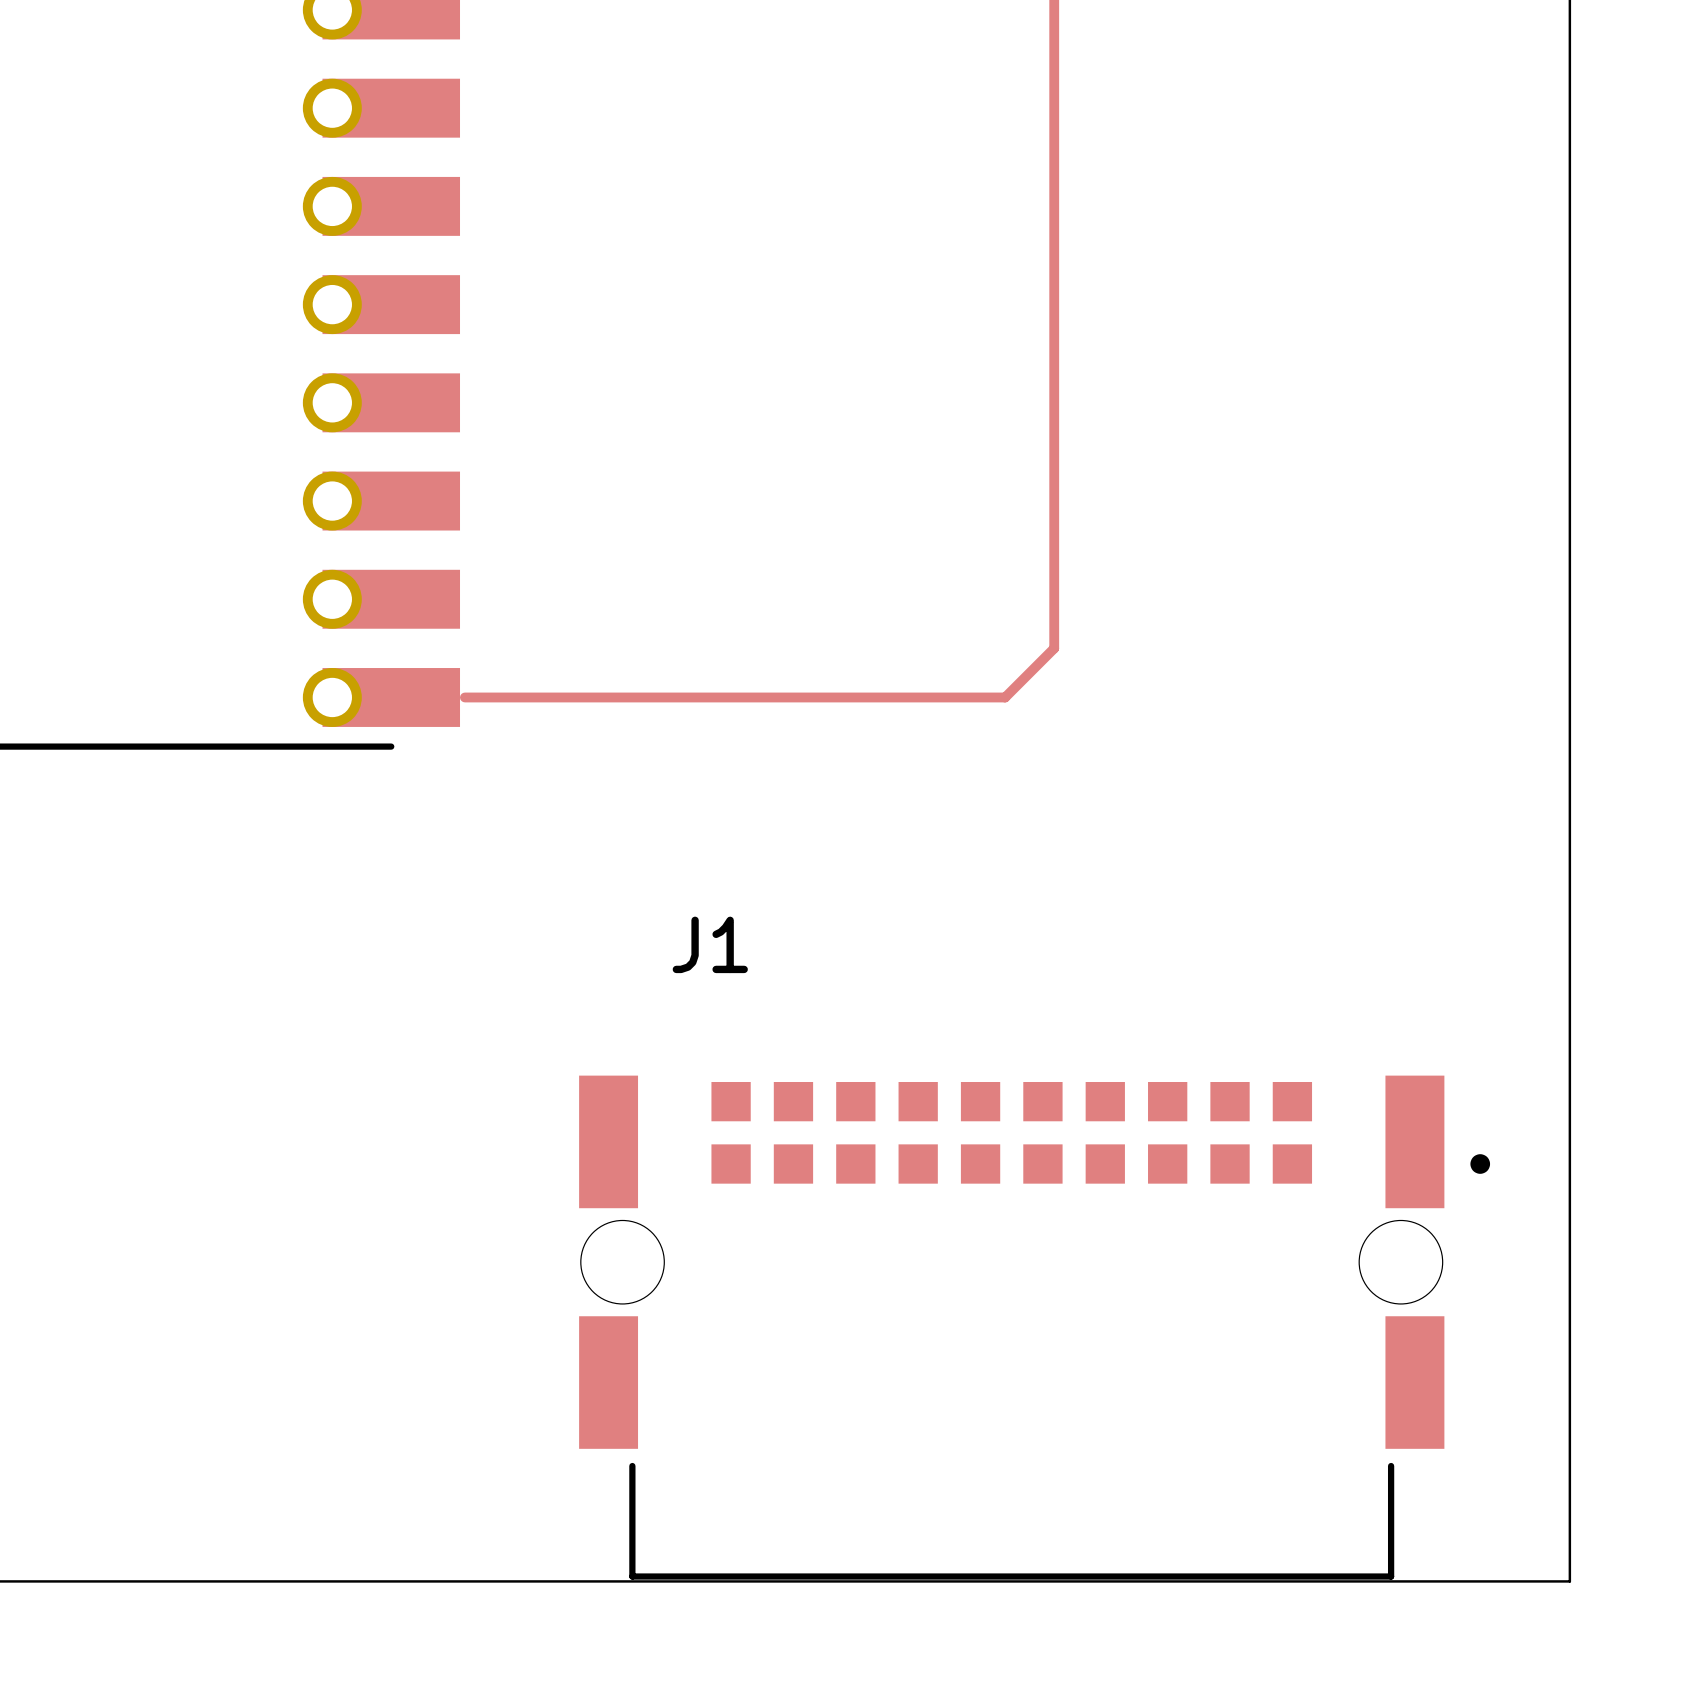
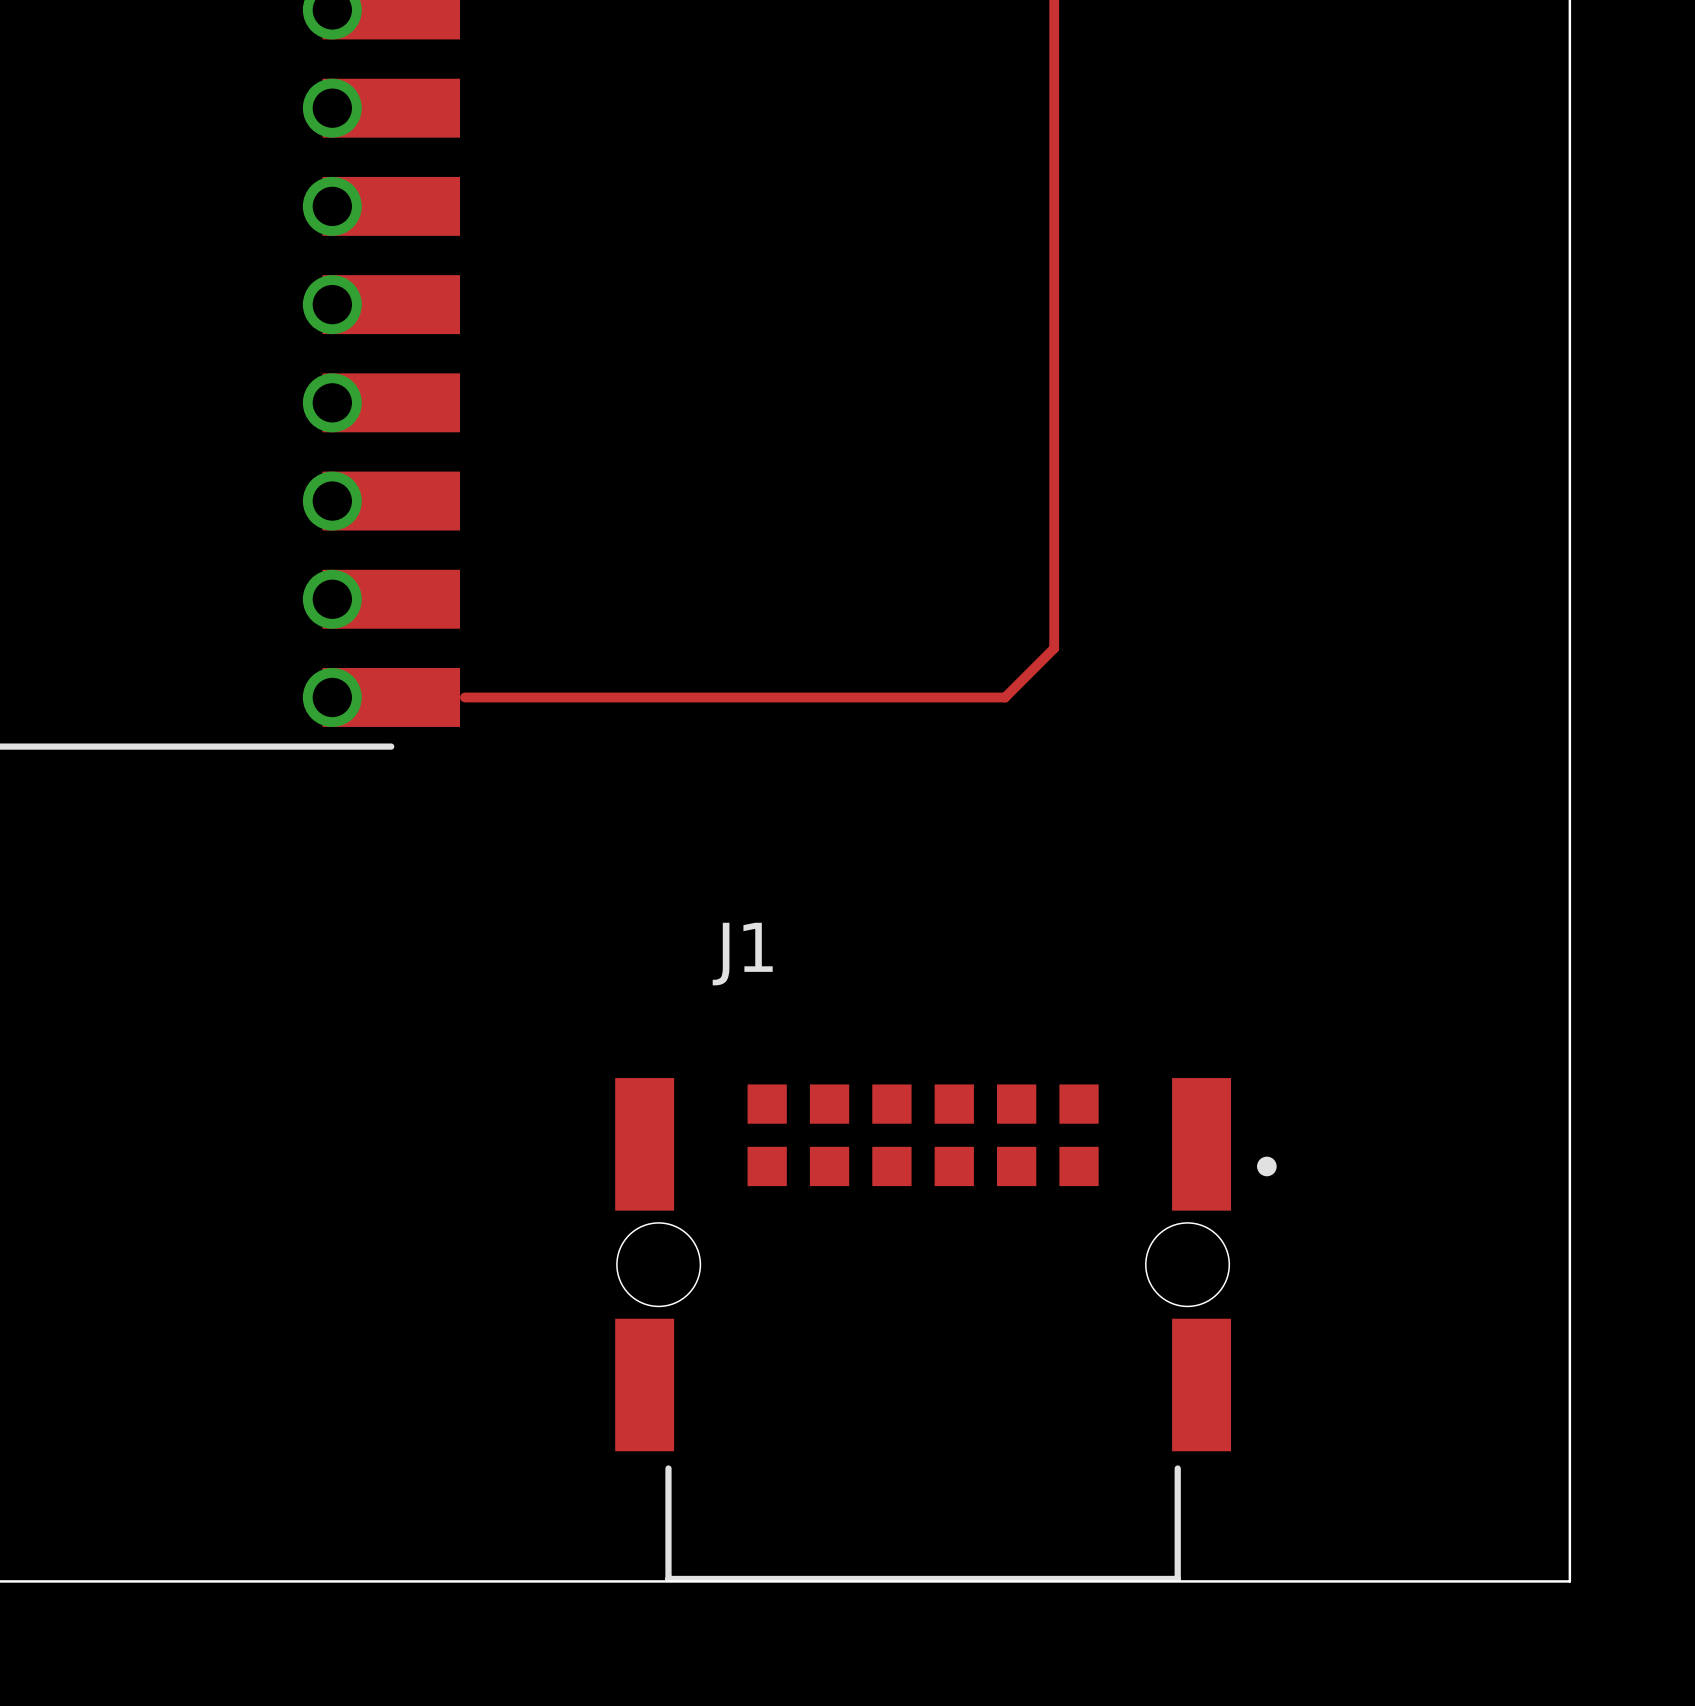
J1 name position: J1 (710, 944) -> J1 (742, 954)
J1 footprint: [579, 1075, 1491, 1580] -> [615, 1078, 1277, 1583]

